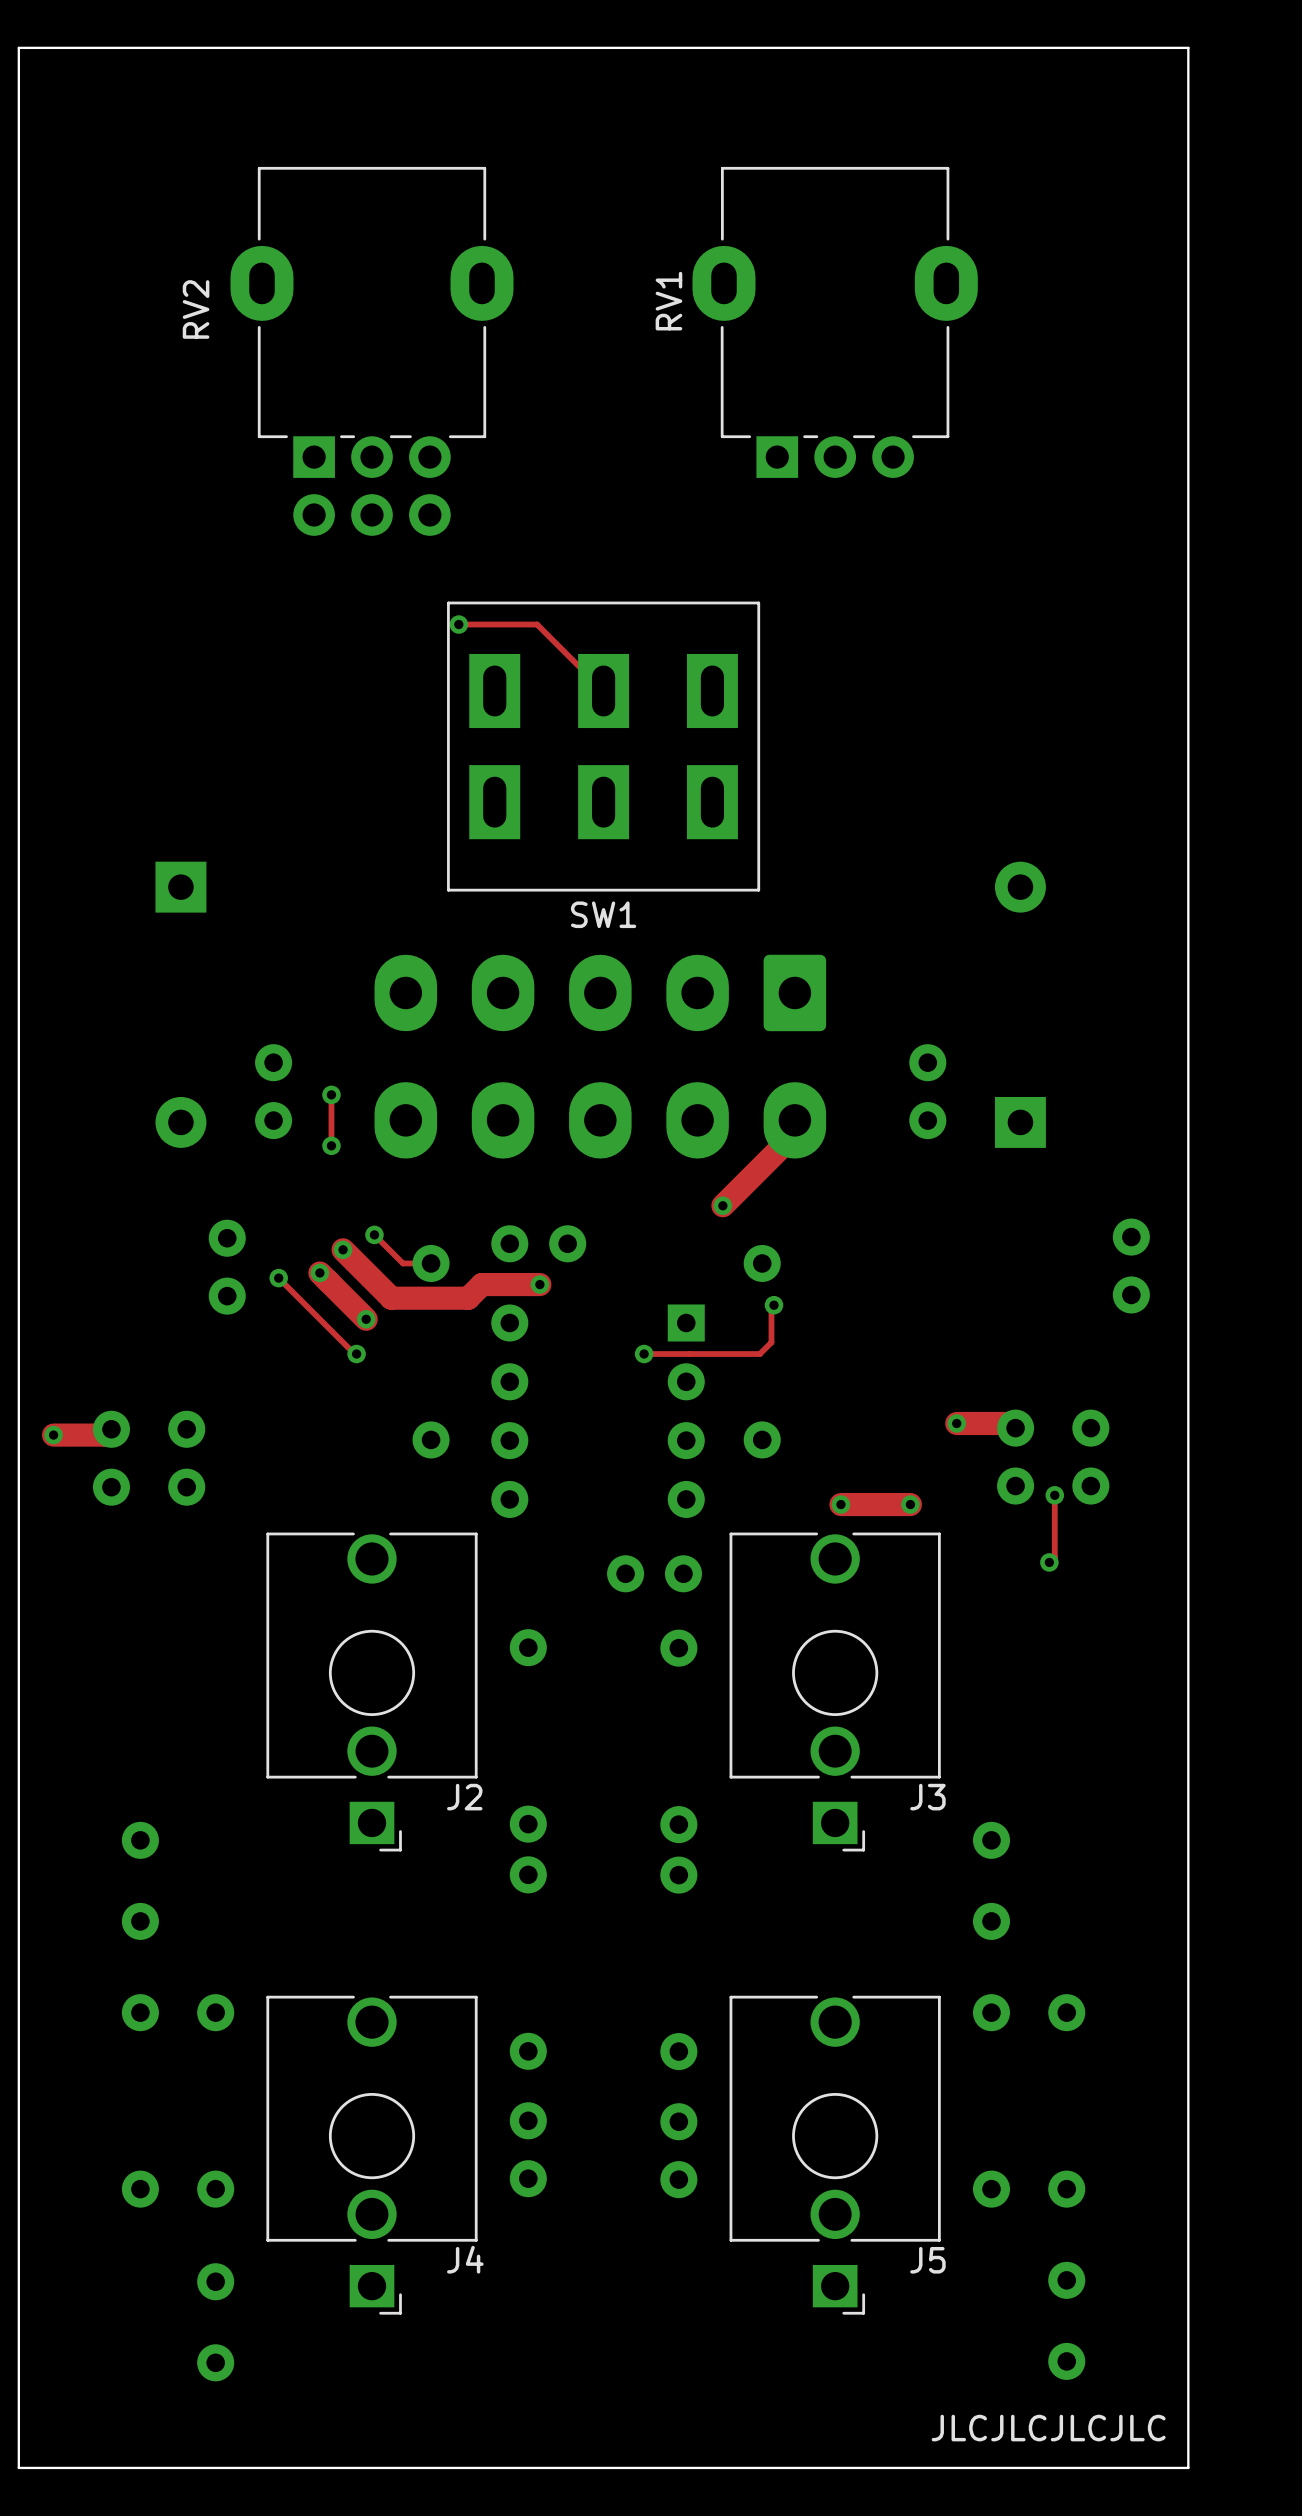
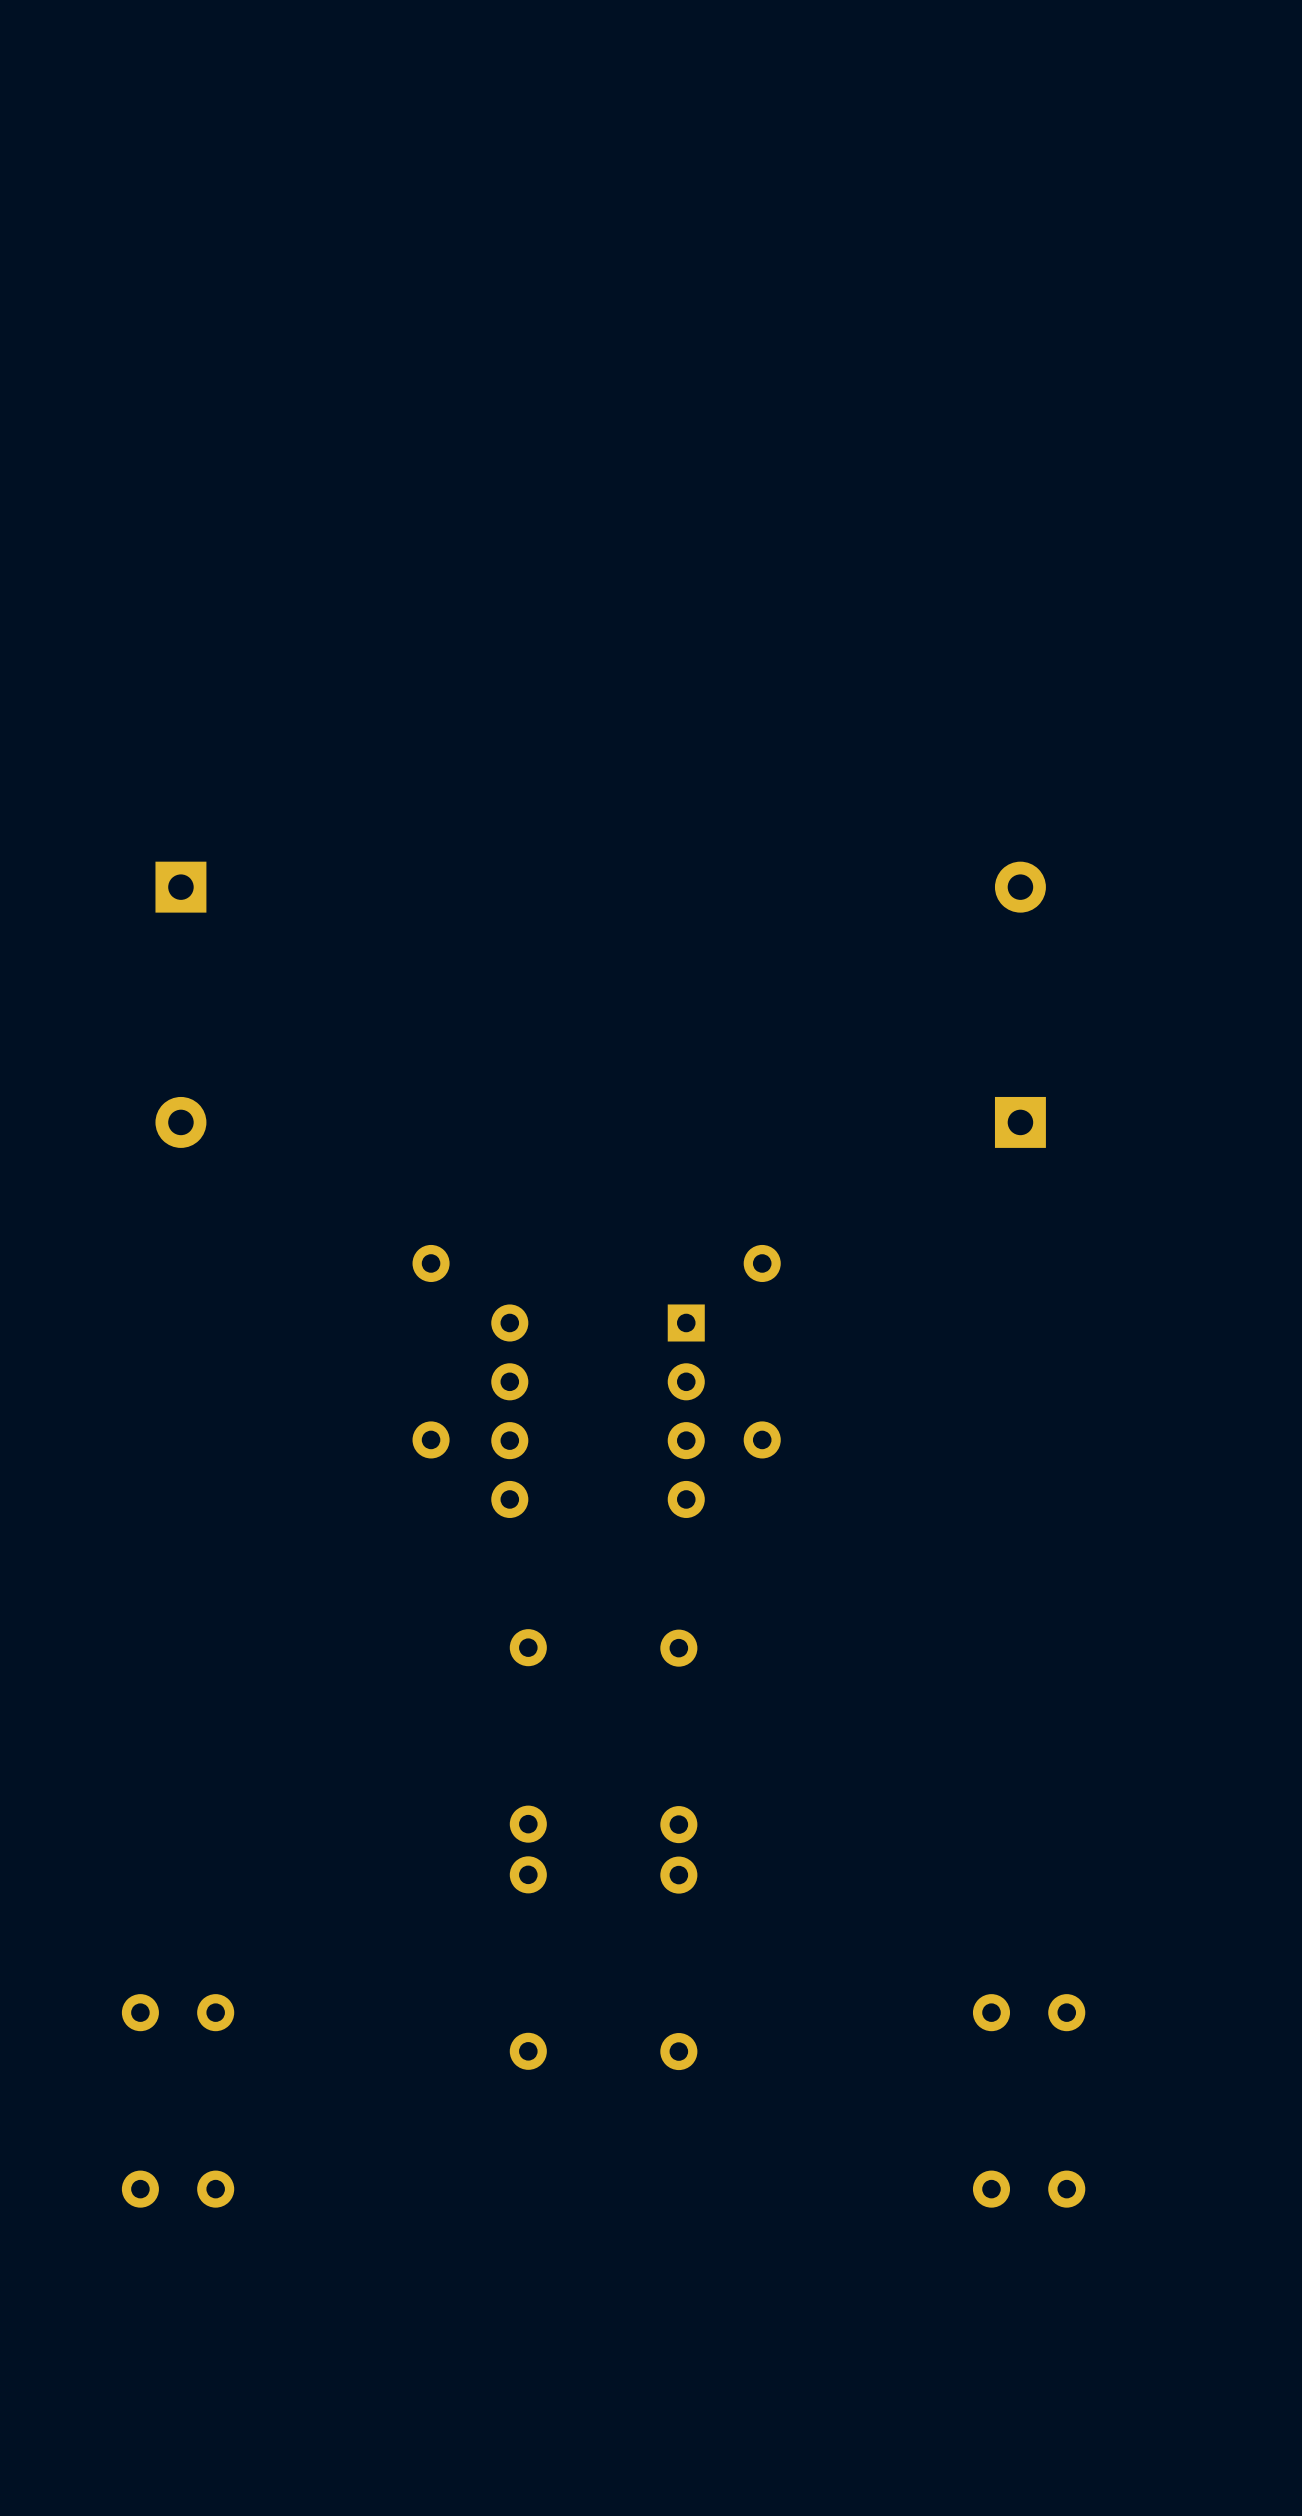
board edge: (18, 47) (1188, 47) (1188, 2467) (18, 2467) (18, 47) -> none
RV1: (835, 322) -> none
RV2: (372, 351) -> none
track: (458, 624) (537, 624) (603, 690) -> none
via: (458, 624) -> none
SW1: (603, 746) -> none
part: (600, 1056) -> none
part: (273, 1091) -> none
part: (927, 1091) -> none
track: (331, 1094) (331, 1145) -> none
via: (331, 1094) -> none
track: (794, 1120) (794, 1133) (722, 1205) -> none
via: (331, 1145) -> none
via: (722, 1205) -> none
track: (374, 1234) (403, 1263) (431, 1263) -> none
via: (374, 1234) -> none
part: (538, 1243) -> none
track: (343, 1249) (391, 1298) (468, 1298) (482, 1284) (539, 1284) -> none
via: (343, 1249) -> none
part: (1131, 1266) -> none
part: (227, 1267) -> none
track: (319, 1272) (366, 1319) -> none
via: (319, 1272) -> none
track: (278, 1278) (356, 1354) -> none
via: (278, 1278) -> none
via: (539, 1284) -> none
track: (773, 1305) (771, 1307) (771, 1342) (759, 1354) (644, 1354) -> none
via: (773, 1305) -> none
via: (366, 1319) -> none
via: (356, 1354) -> none
via: (644, 1354) -> none
track: (956, 1423) (1010, 1423) (1015, 1428) -> none
via: (956, 1423) -> none
track: (111, 1429) (105, 1435) (53, 1435) -> none
via: (53, 1435) -> none
part: (1015, 1457) -> none
part: (1090, 1457) -> none
part: (111, 1458) -> none
part: (186, 1458) -> none
track: (1054, 1495) (1054, 1557) (1049, 1562) -> none
via: (1054, 1495) -> none
track: (840, 1504) (910, 1504) -> none
via: (840, 1504) -> none
via: (910, 1504) -> none
via: (1049, 1562) -> none
part: (654, 1573) -> none
J2: (372, 1692) -> none
J3: (835, 1692) -> none
part: (140, 1880) -> none
part: (991, 1880) -> none
part: (528, 2149) -> none
part: (678, 2150) -> none
J4: (372, 2155) -> none
J5: (835, 2155) -> none
part: (1066, 2320) -> none
part: (215, 2322) -> none
text: JLCJLCJLCJLC (1048, 2428) -> none

